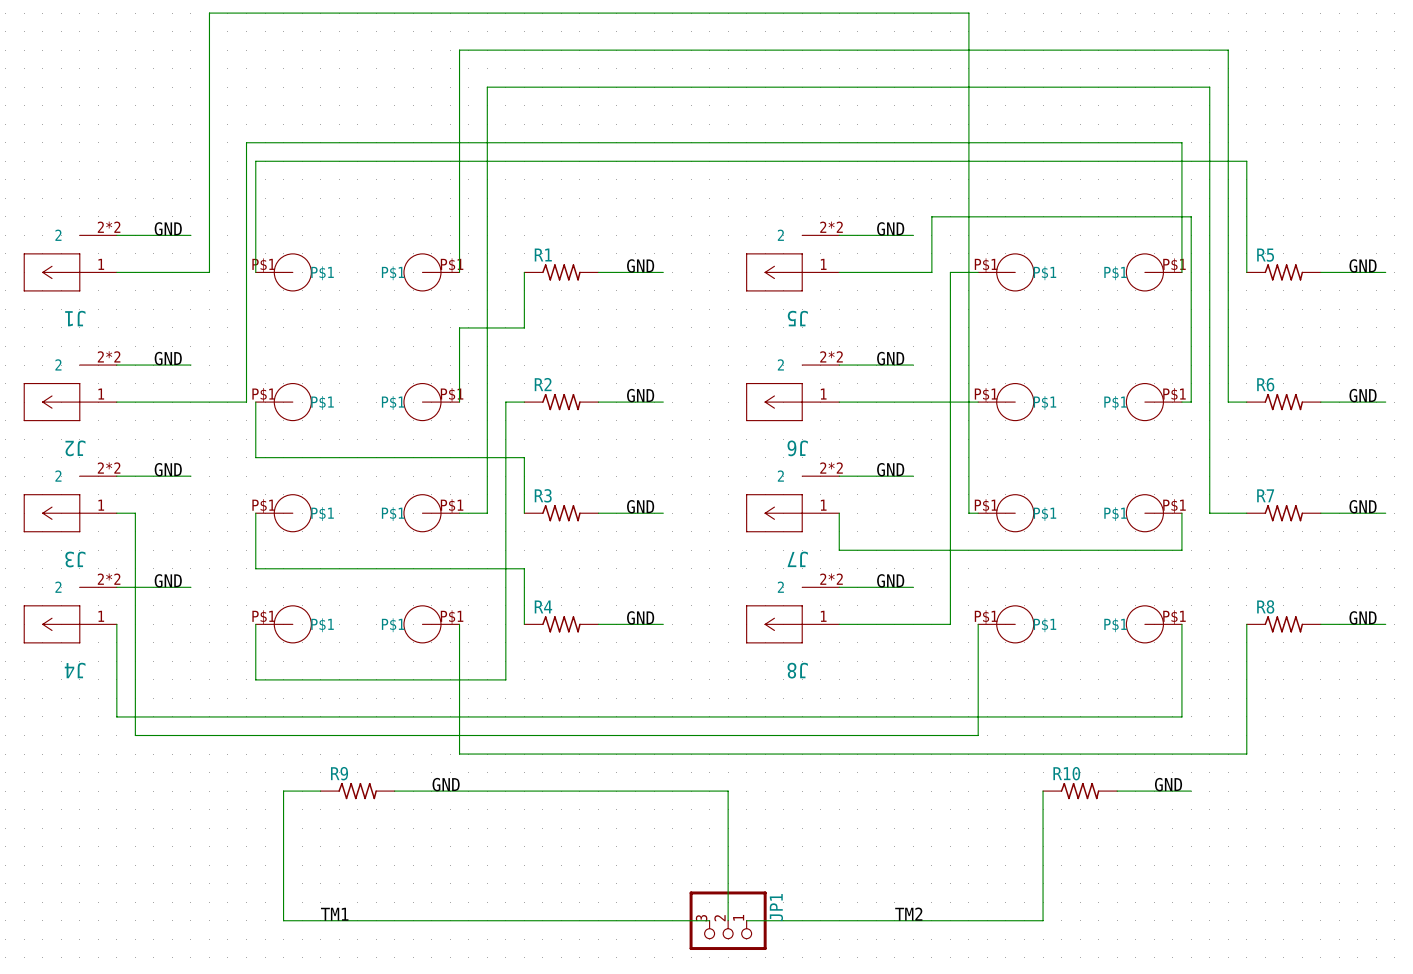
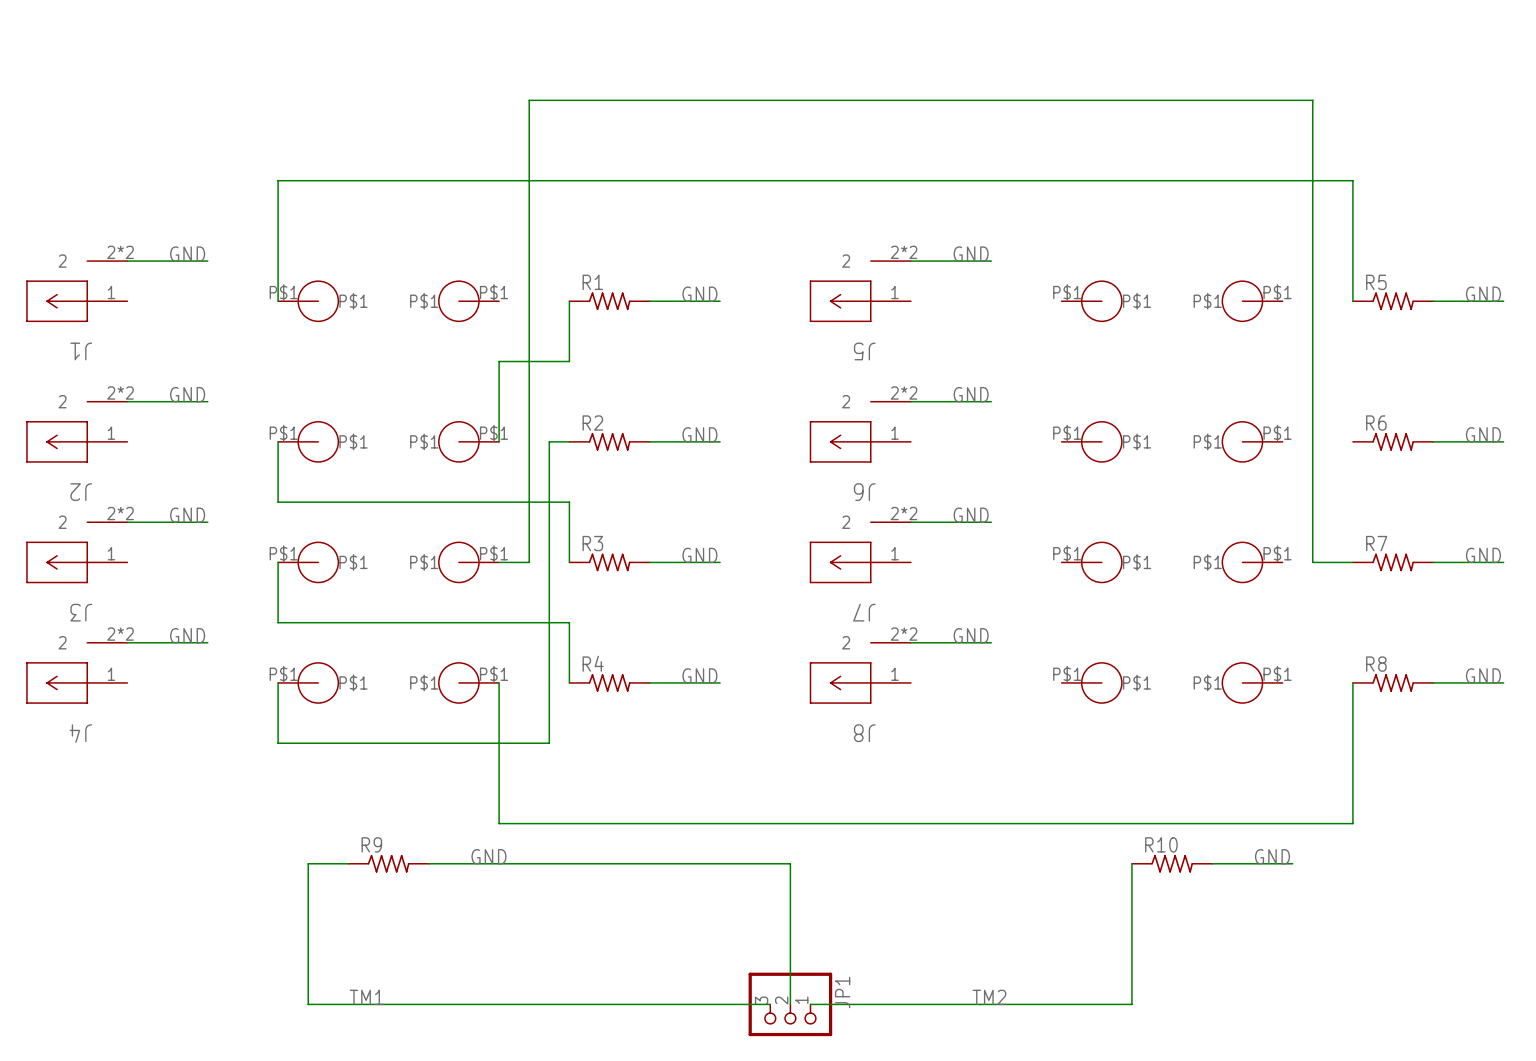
wire: (116, 272) (209, 272) (209, 13) (968, 13) (968, 513) (978, 513) -> none
wire: (459, 272) (459, 50) (1228, 50) (1228, 402) (1246, 402) -> none
wire: (839, 272) (931, 272) (931, 216) (1191, 216) (1191, 402) (1181, 402) -> none
wire: (978, 272) (950, 272) (950, 624) (839, 624) -> none
wire: (1181, 272) (1181, 142) (246, 142) (246, 402) (116, 402) -> none
wire: (839, 402) (978, 402) -> none
wire: (116, 513) (135, 513) (135, 735) (978, 735) (978, 624) -> none
wire: (839, 513) (839, 550) (1181, 550) (1181, 513) -> none
wire: (116, 624) (116, 716) (1181, 716) (1181, 624) -> none

